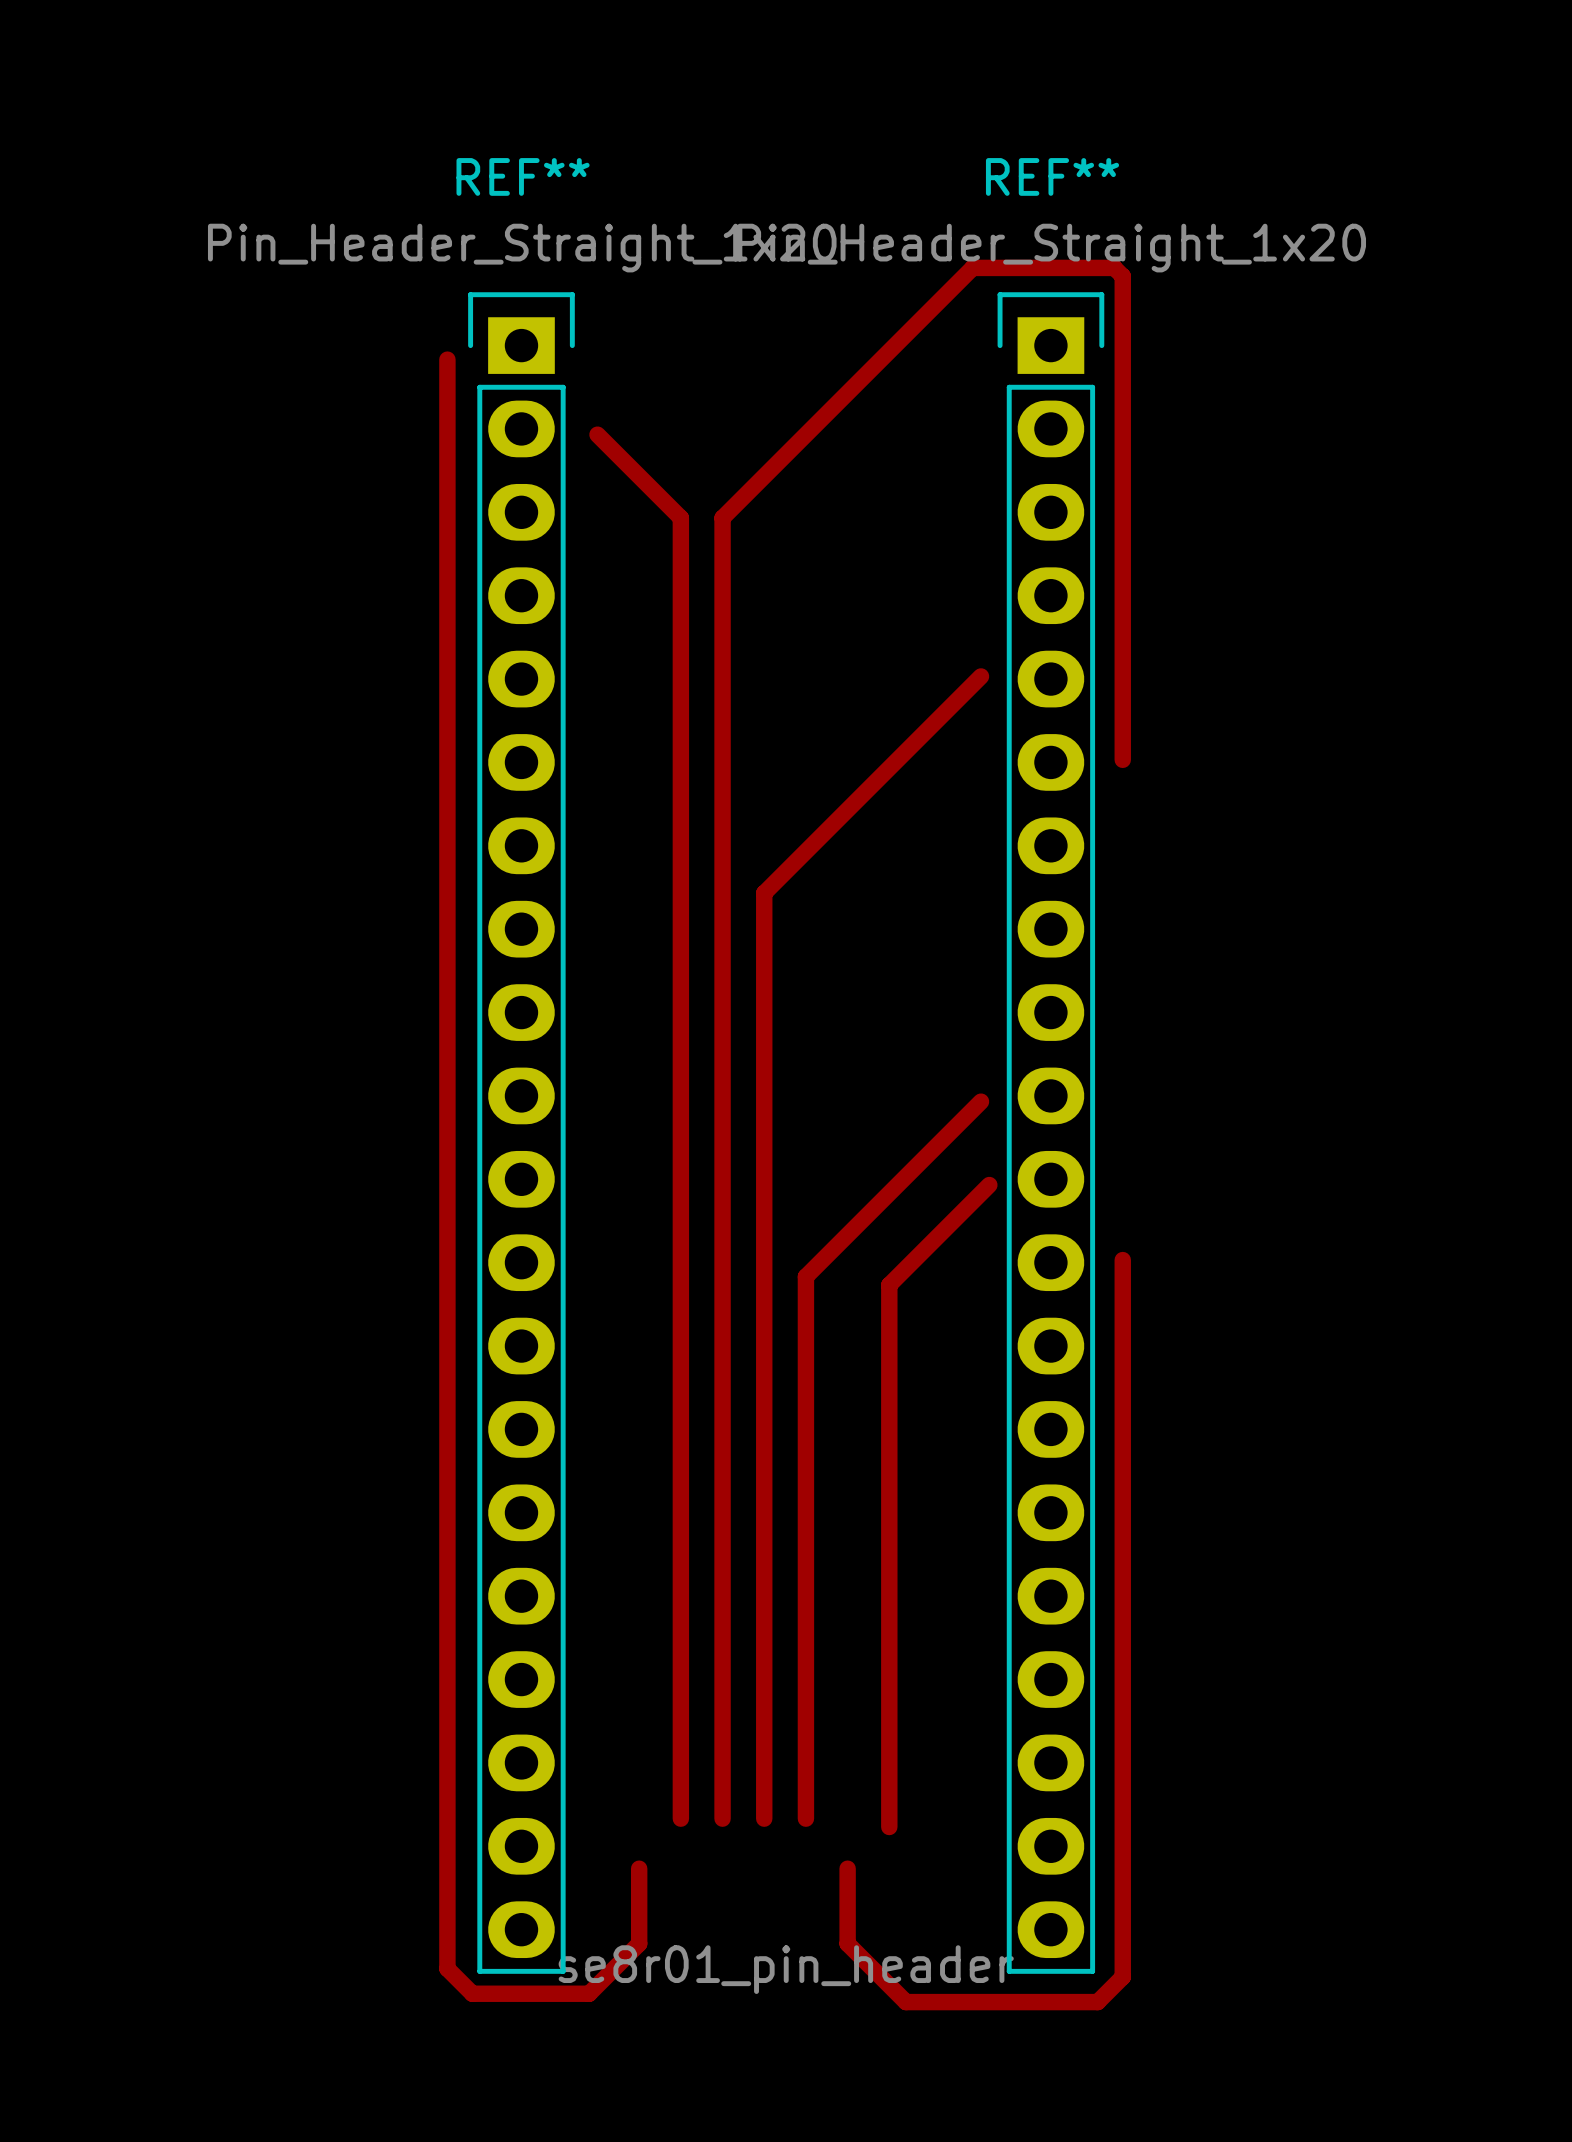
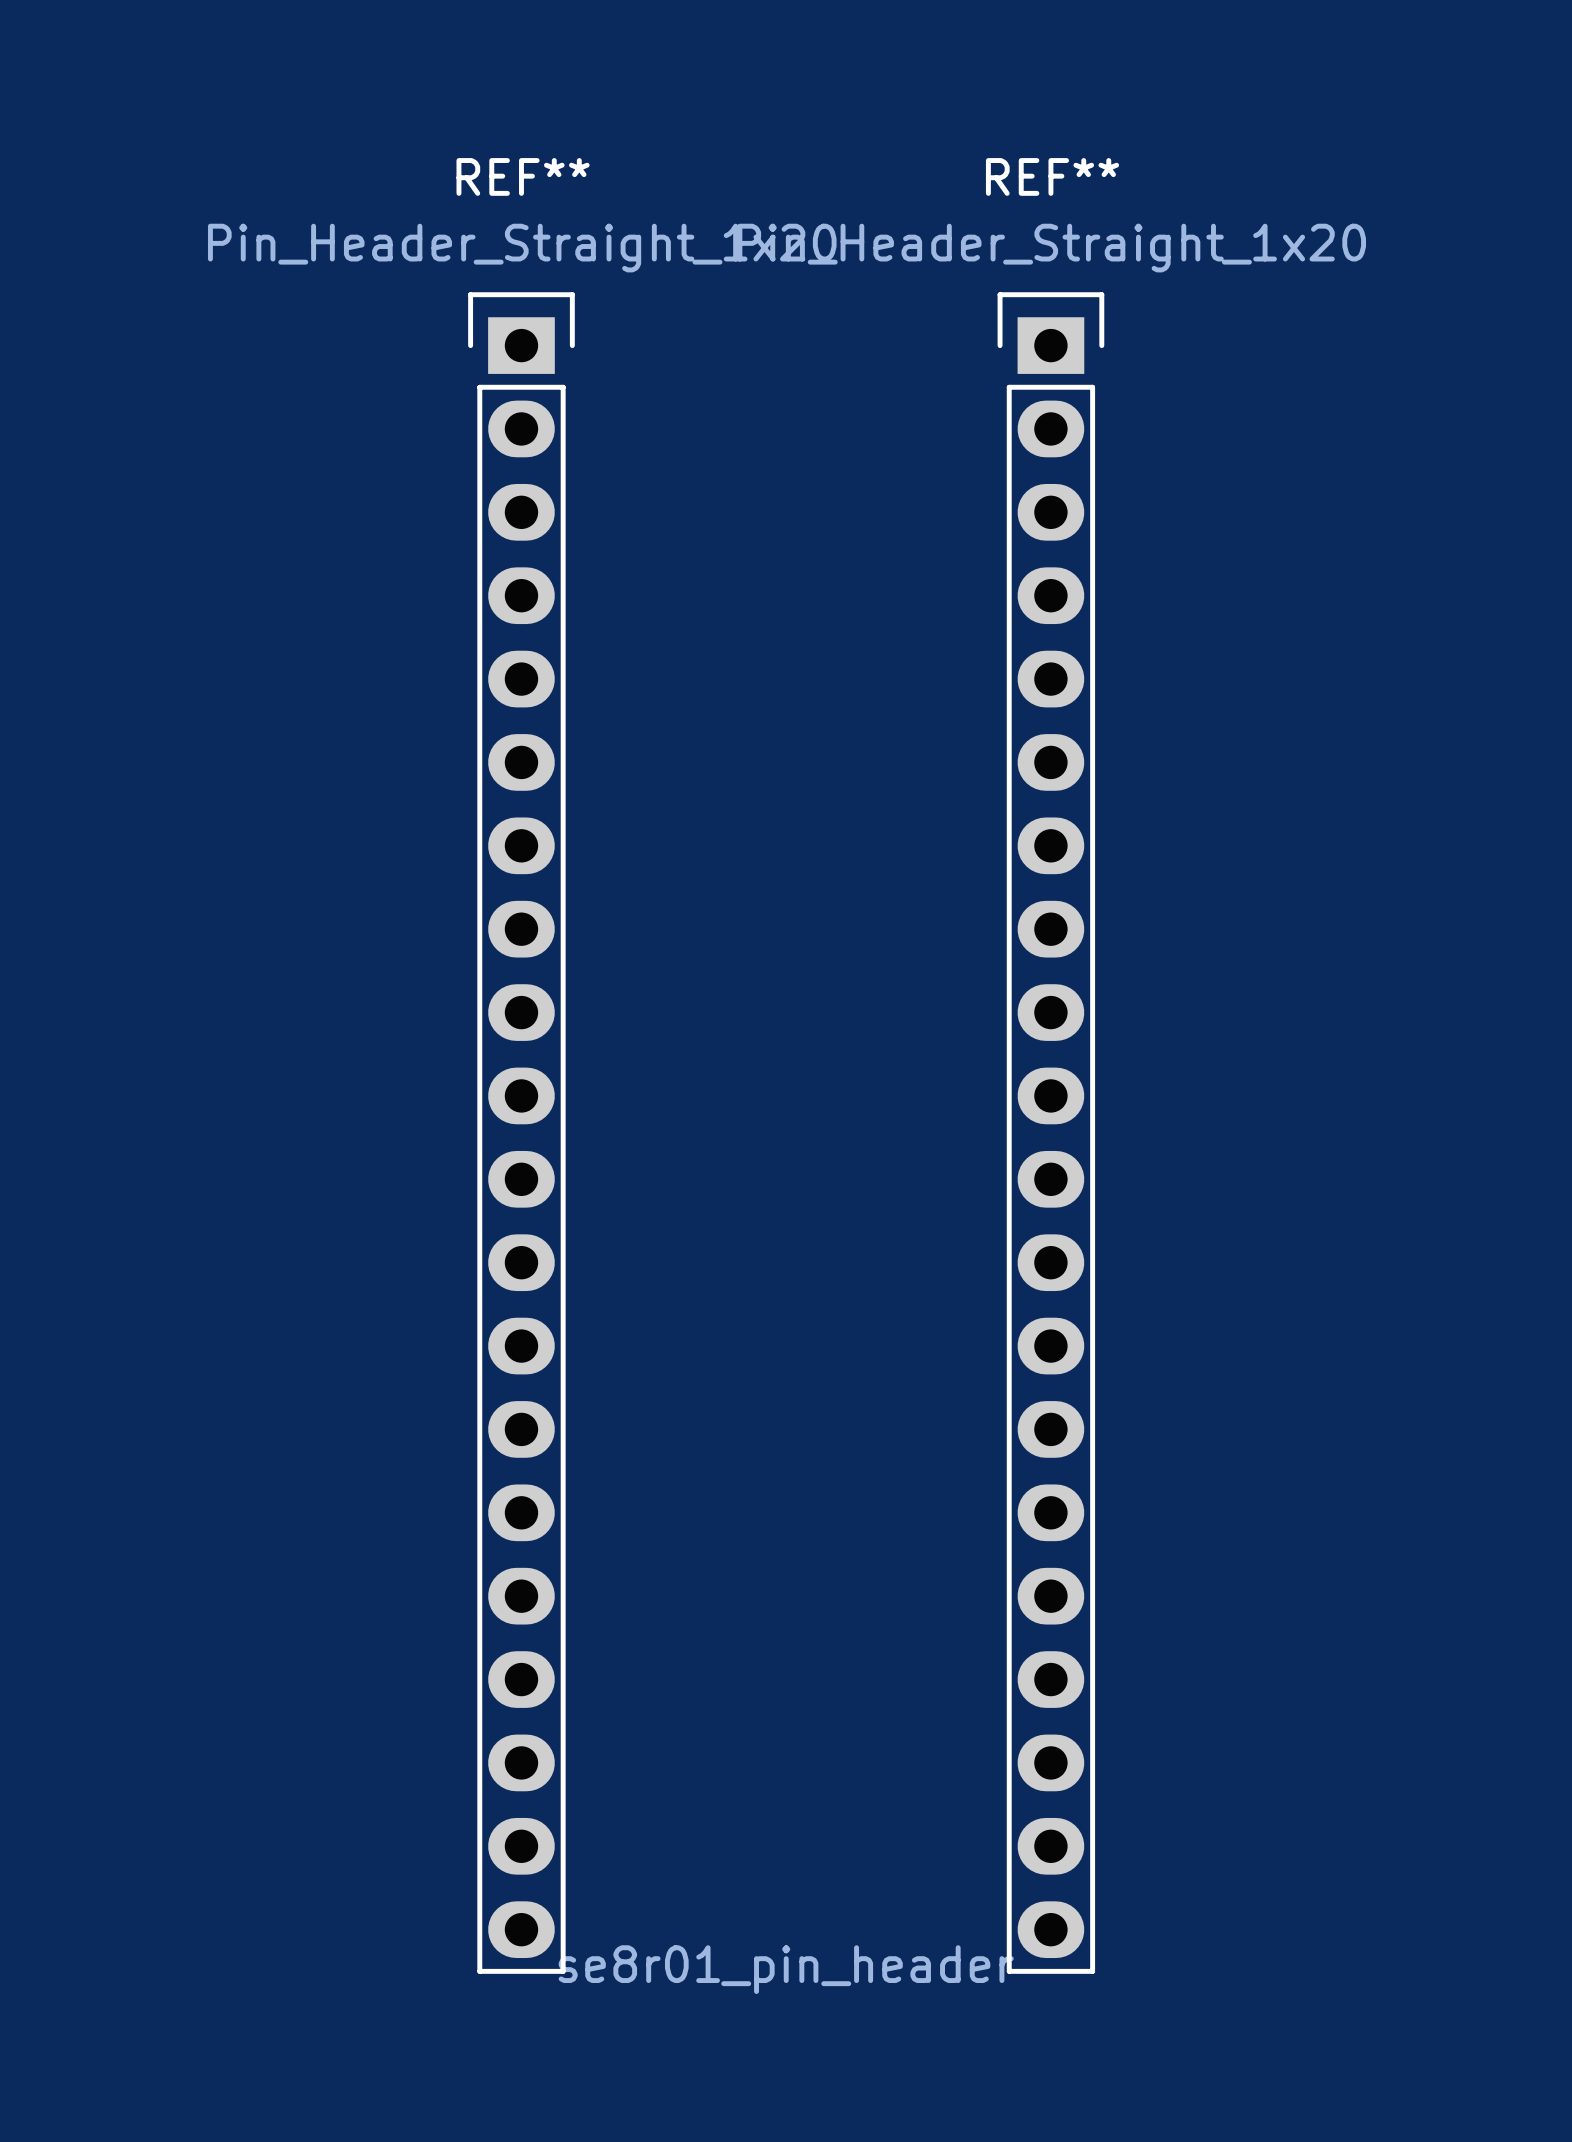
track: (447, 359) (447, 1968) (472, 1993) (589, 1993) (639, 1943) (639, 1868) -> none
track: (597, 434) (680, 518) (680, 1818) -> none
track: (981, 676) (764, 893) (764, 1818) -> none
track: (1122, 759) (1122, 276) (1114, 267) (972, 267) (722, 518) (722, 1818) -> none
track: (981, 1101) (805, 1276) (805, 1818) -> none
track: (989, 1185) (889, 1285) (889, 1827) -> none
track: (1122, 1260) (1122, 1977) (1097, 2002) (905, 2002) (847, 1943) (847, 1868) -> none

